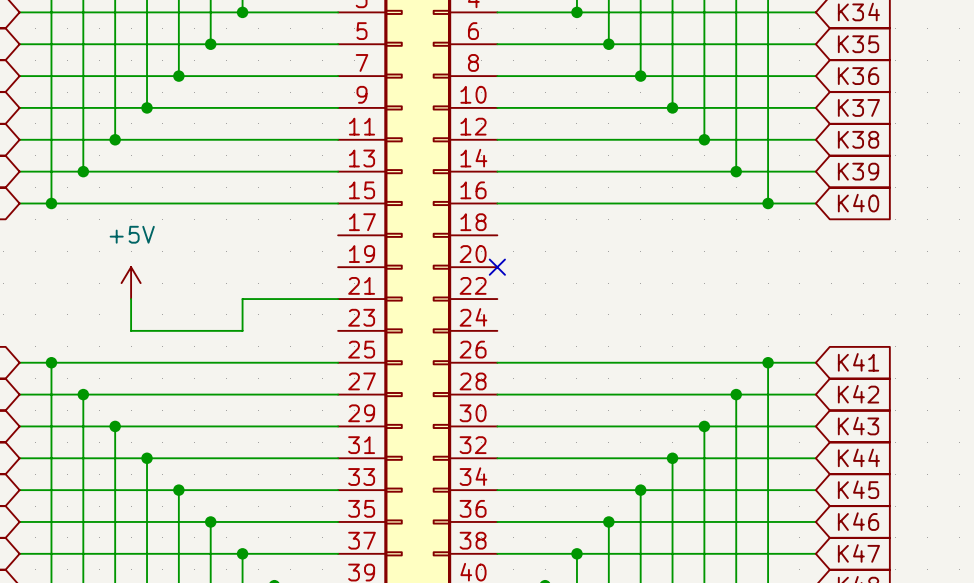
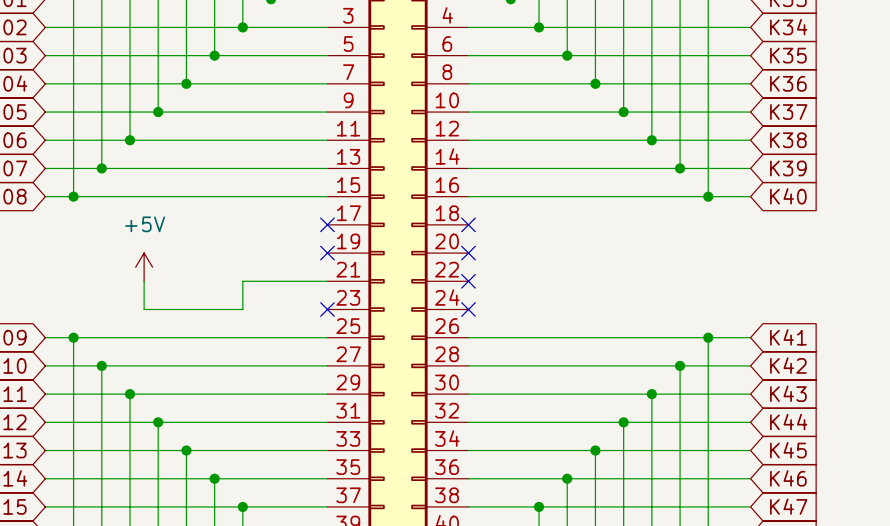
no-connect mark: none -> (327, 224)
no-connect mark: none -> (468, 224)
no-connect mark: none -> (327, 253)
no-connect mark: none -> (468, 281)
no-connect mark: none -> (327, 309)
no-connect mark: none -> (468, 309)

